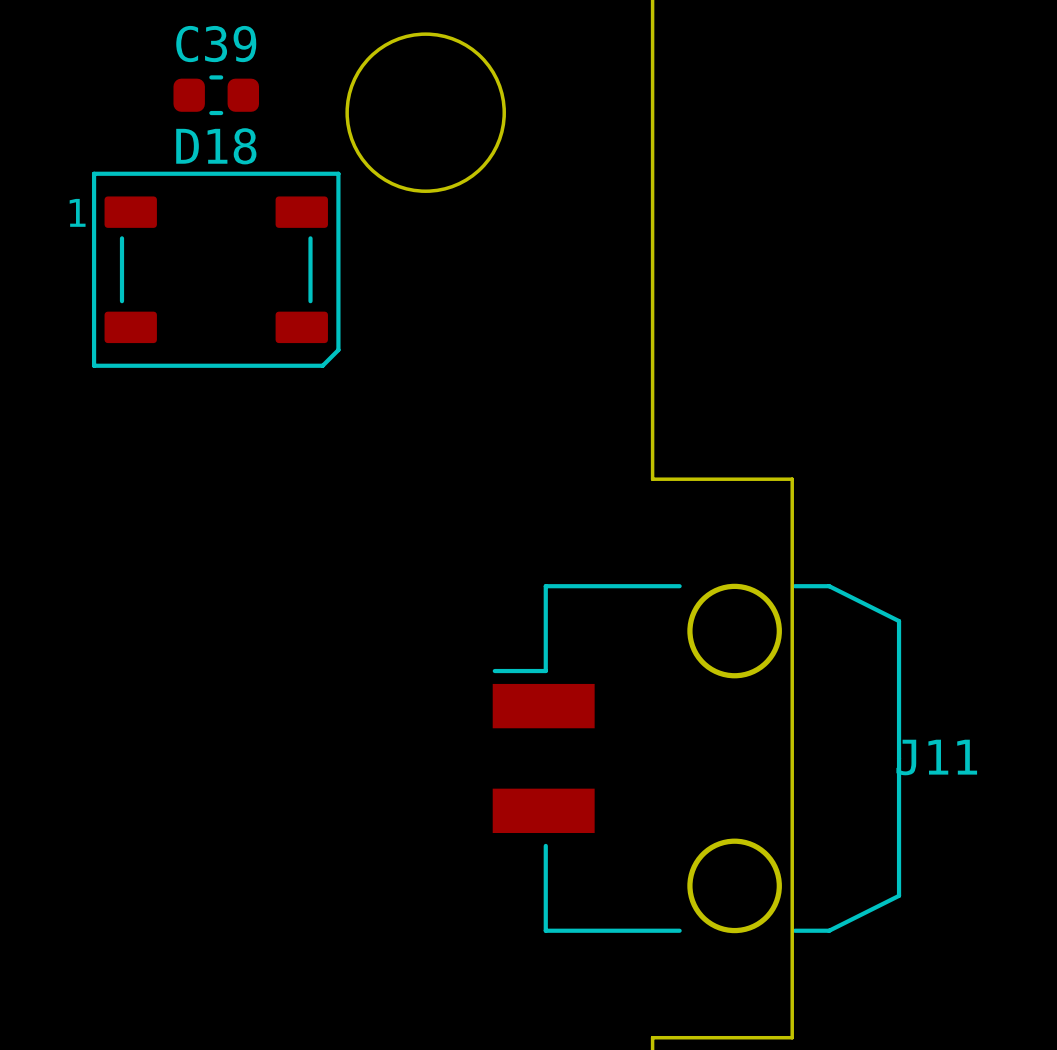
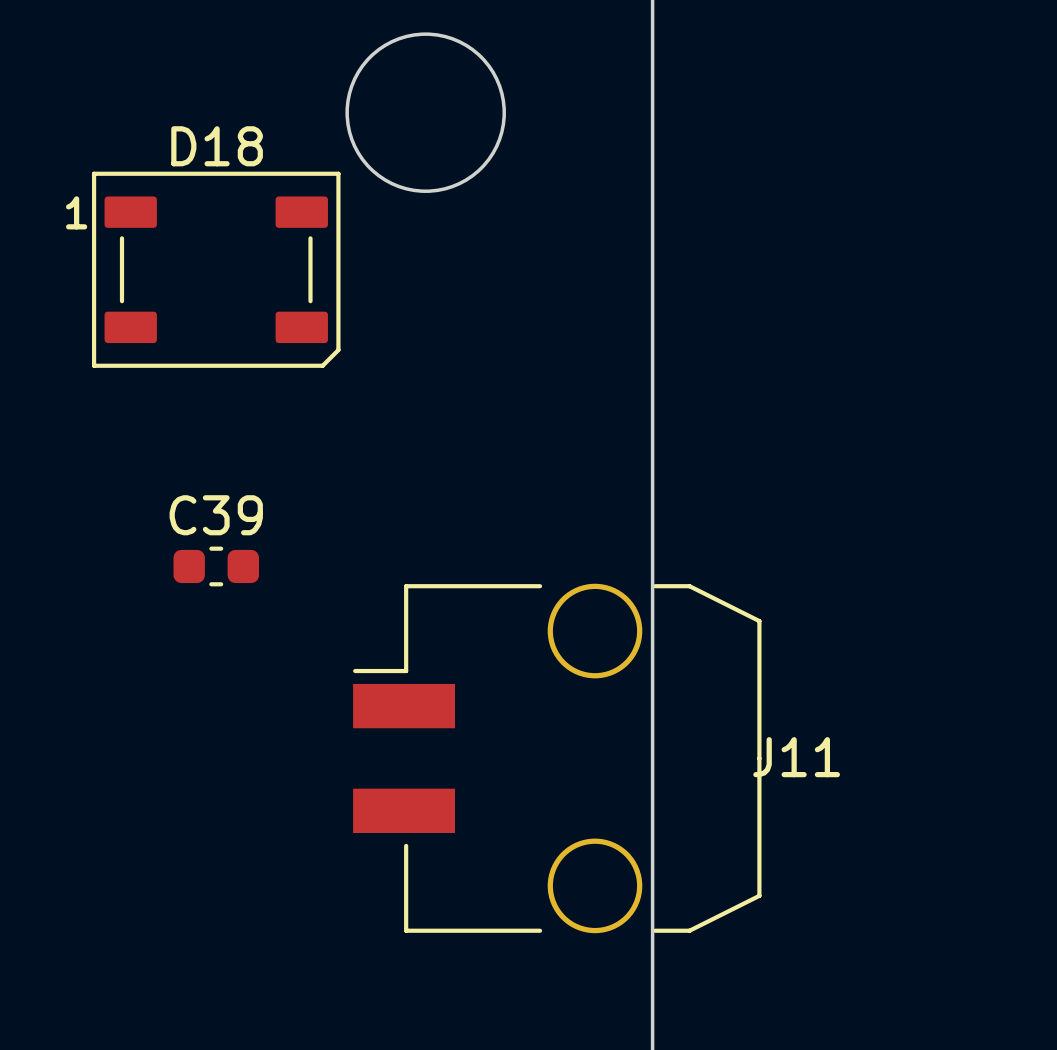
C39 position: (216, 95) -> (216, 566)
board edge: (652, 479) (792, 479) (792, 1037) (652, 1037) -> (652, 479) (652, 1037)
J11 position: (696, 758) -> (557, 758)

